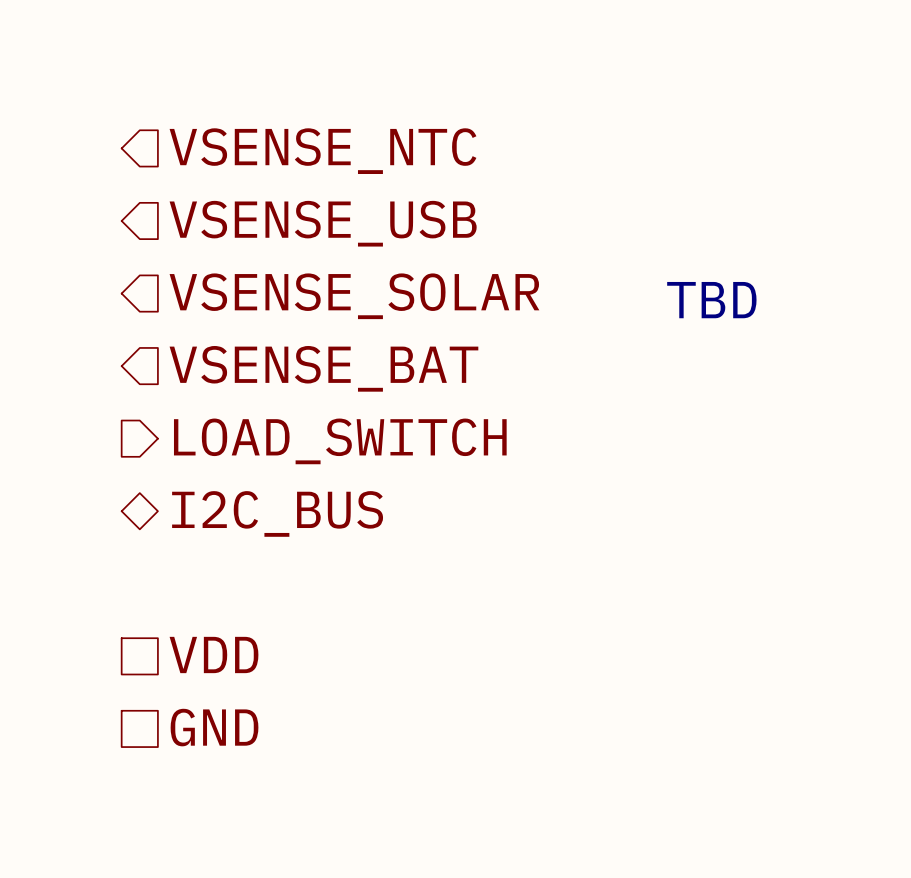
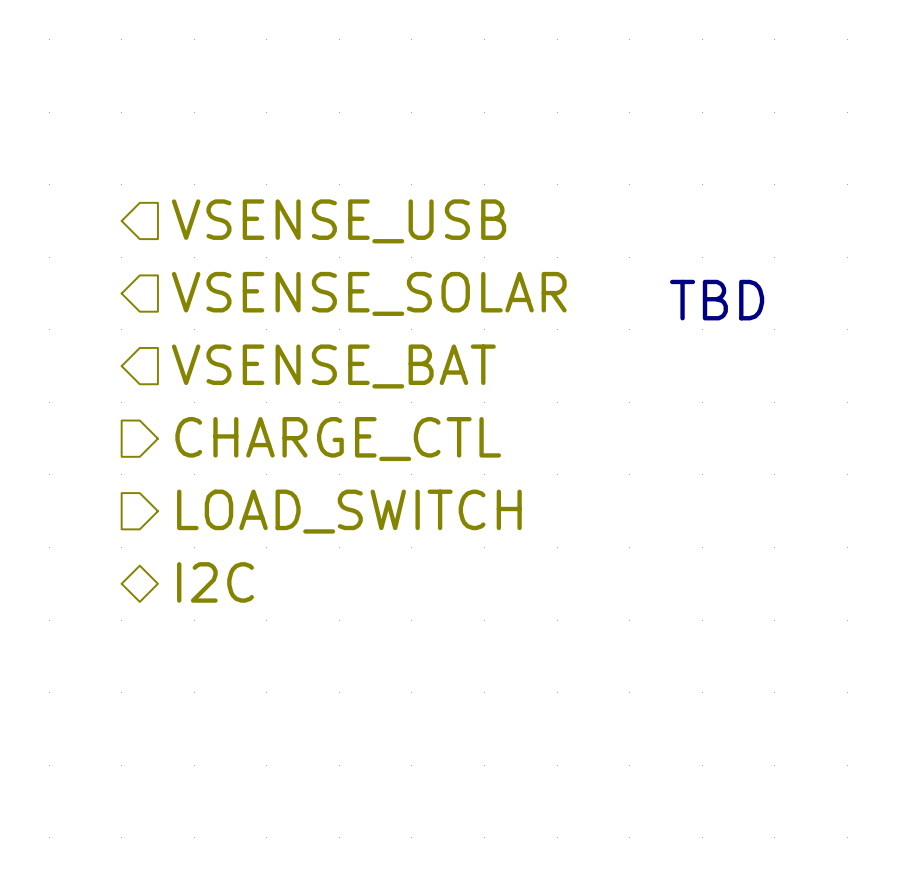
hierarchical label: VSENSE_NTC (322, 151) -> none
hierarchical label: LOAD_SWITCH (340, 441) -> CHARGE_CTL (338, 439)
hierarchical label shape: bidirectional (277, 513) -> output (349, 511)
hierarchical label: I2C_BUS (277, 513) -> LOAD_SWITCH (349, 511)
hierarchical label: none -> I2C (215, 582)
hierarchical label: VDD (213, 654) -> none
hierarchical label: GND (214, 727) -> none

